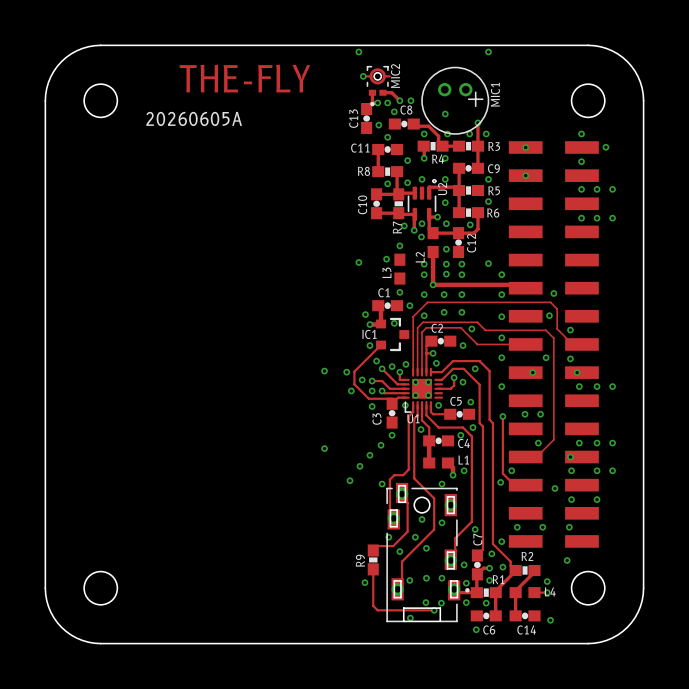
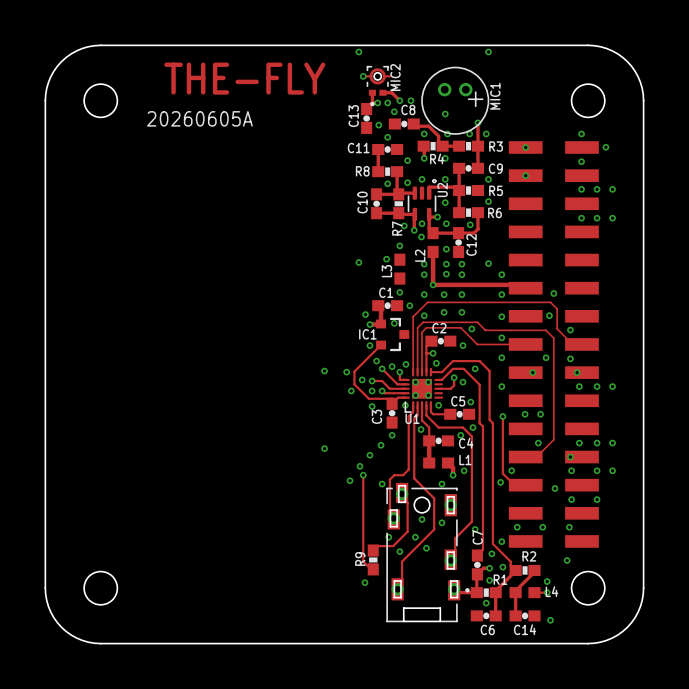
track: none -> (363, 475) (363, 561) (373, 571)
via: none -> (363, 475)
via: (464, 564) -> none
track: (373, 569) (373, 605) (377, 610) (434, 610) -> none
via: (426, 578) -> none
via: (441, 578) -> none
via: (409, 580) -> none
via: (466, 583) -> none
via: (425, 602) -> none
via: (466, 602) -> none
via: (441, 603) -> none
via: (434, 610) -> none
via: (410, 618) -> none
via: (476, 629) -> none

